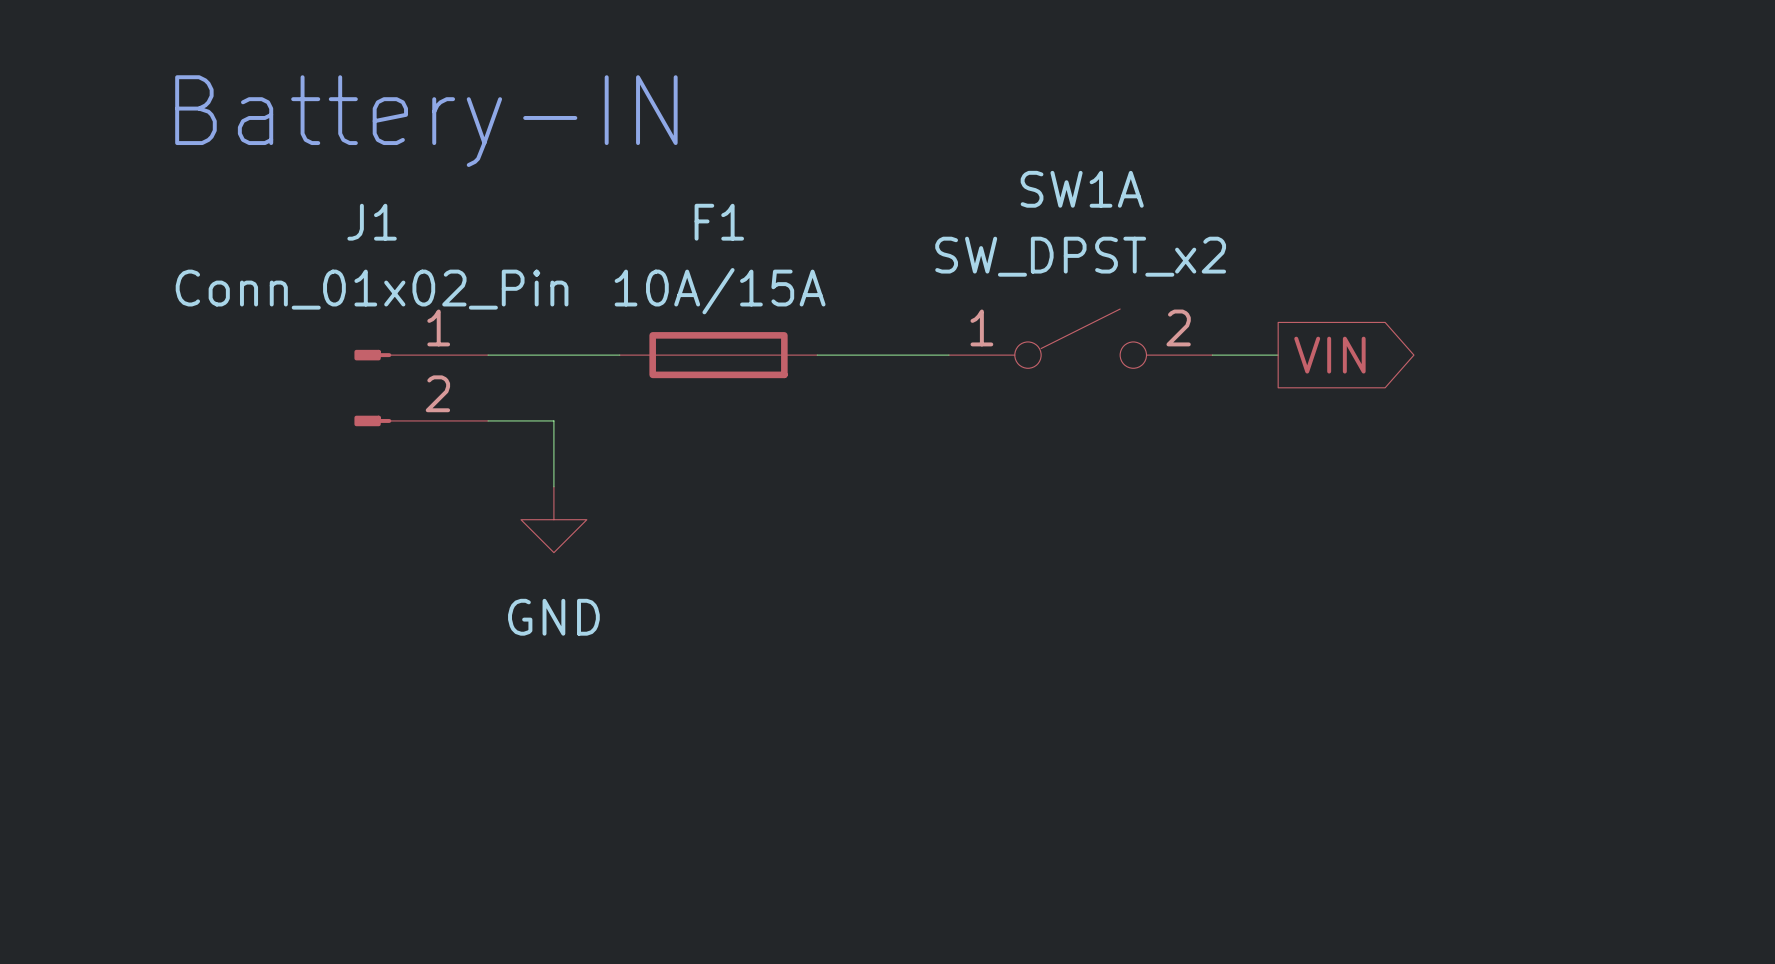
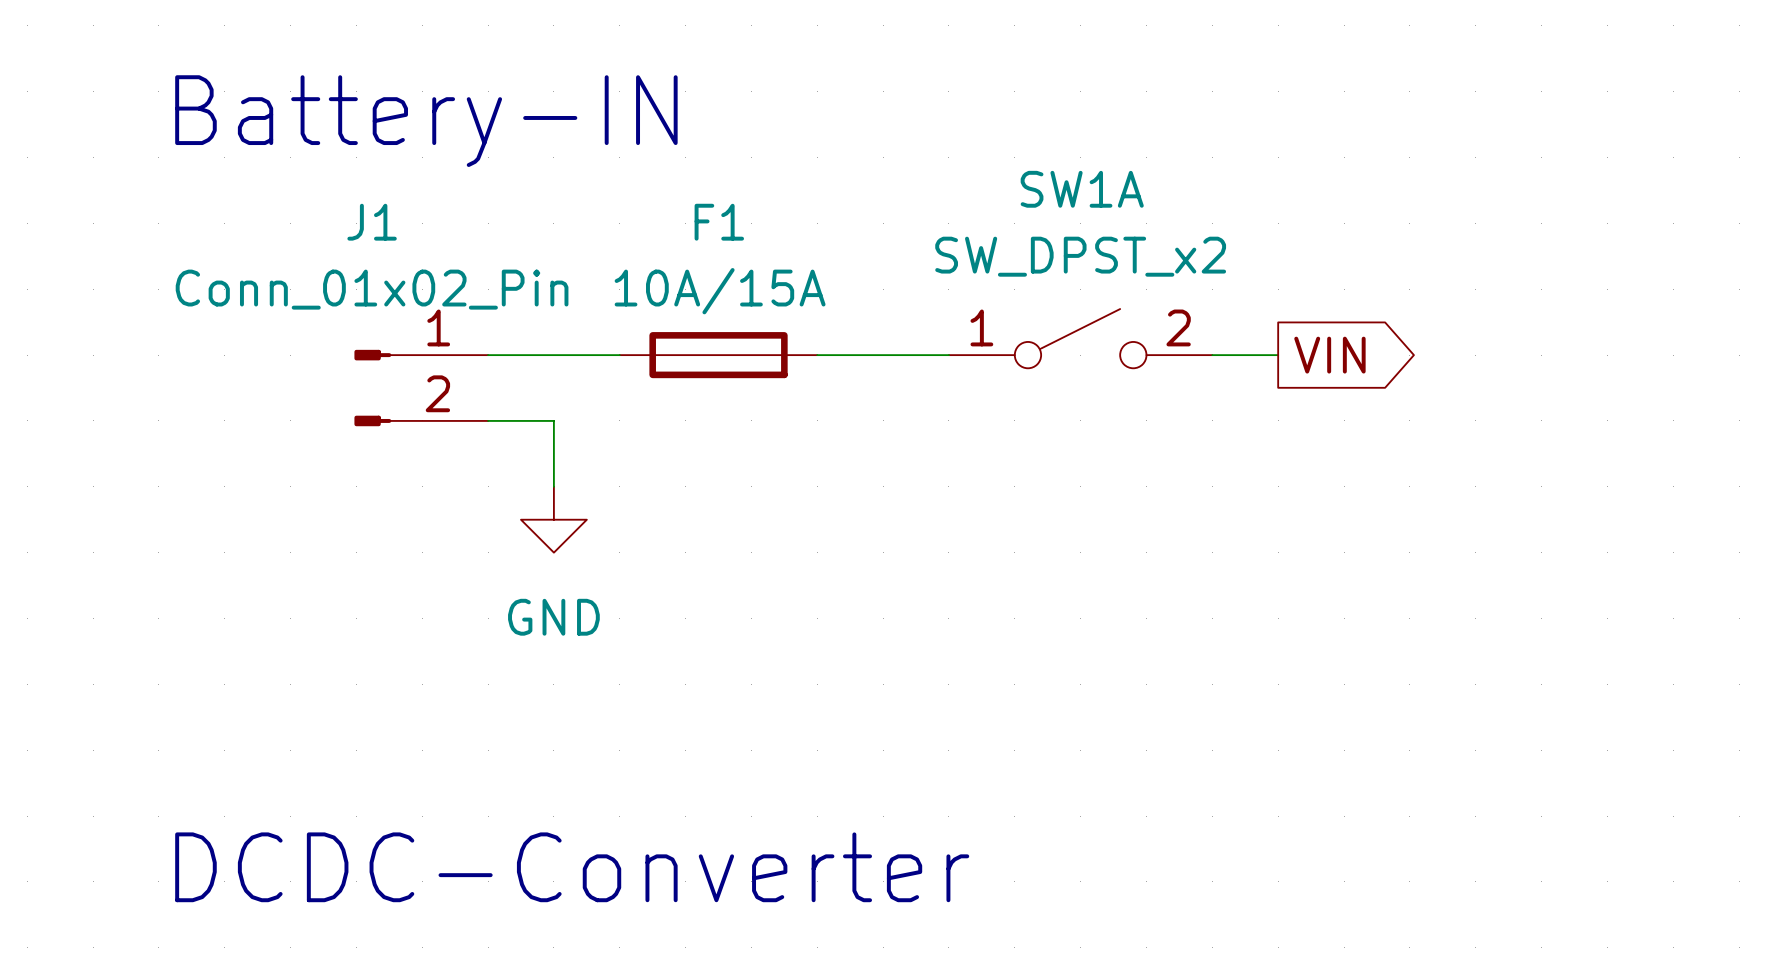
text: none -> DCDC-Converter (572, 867)

